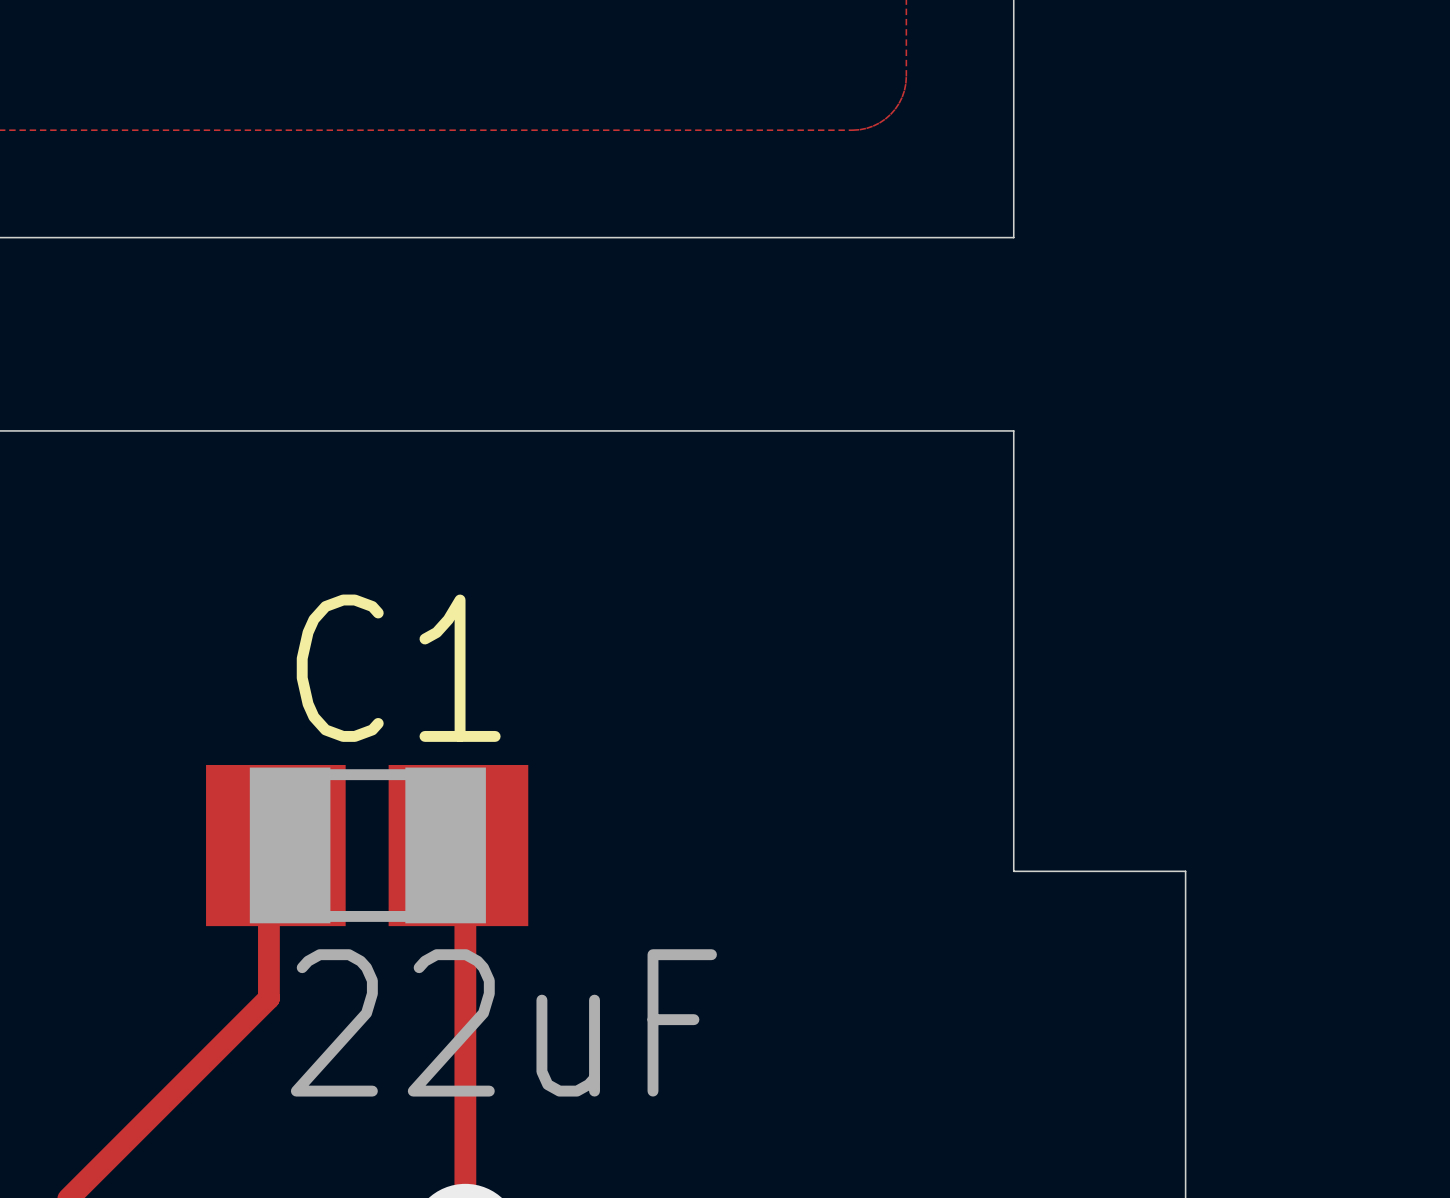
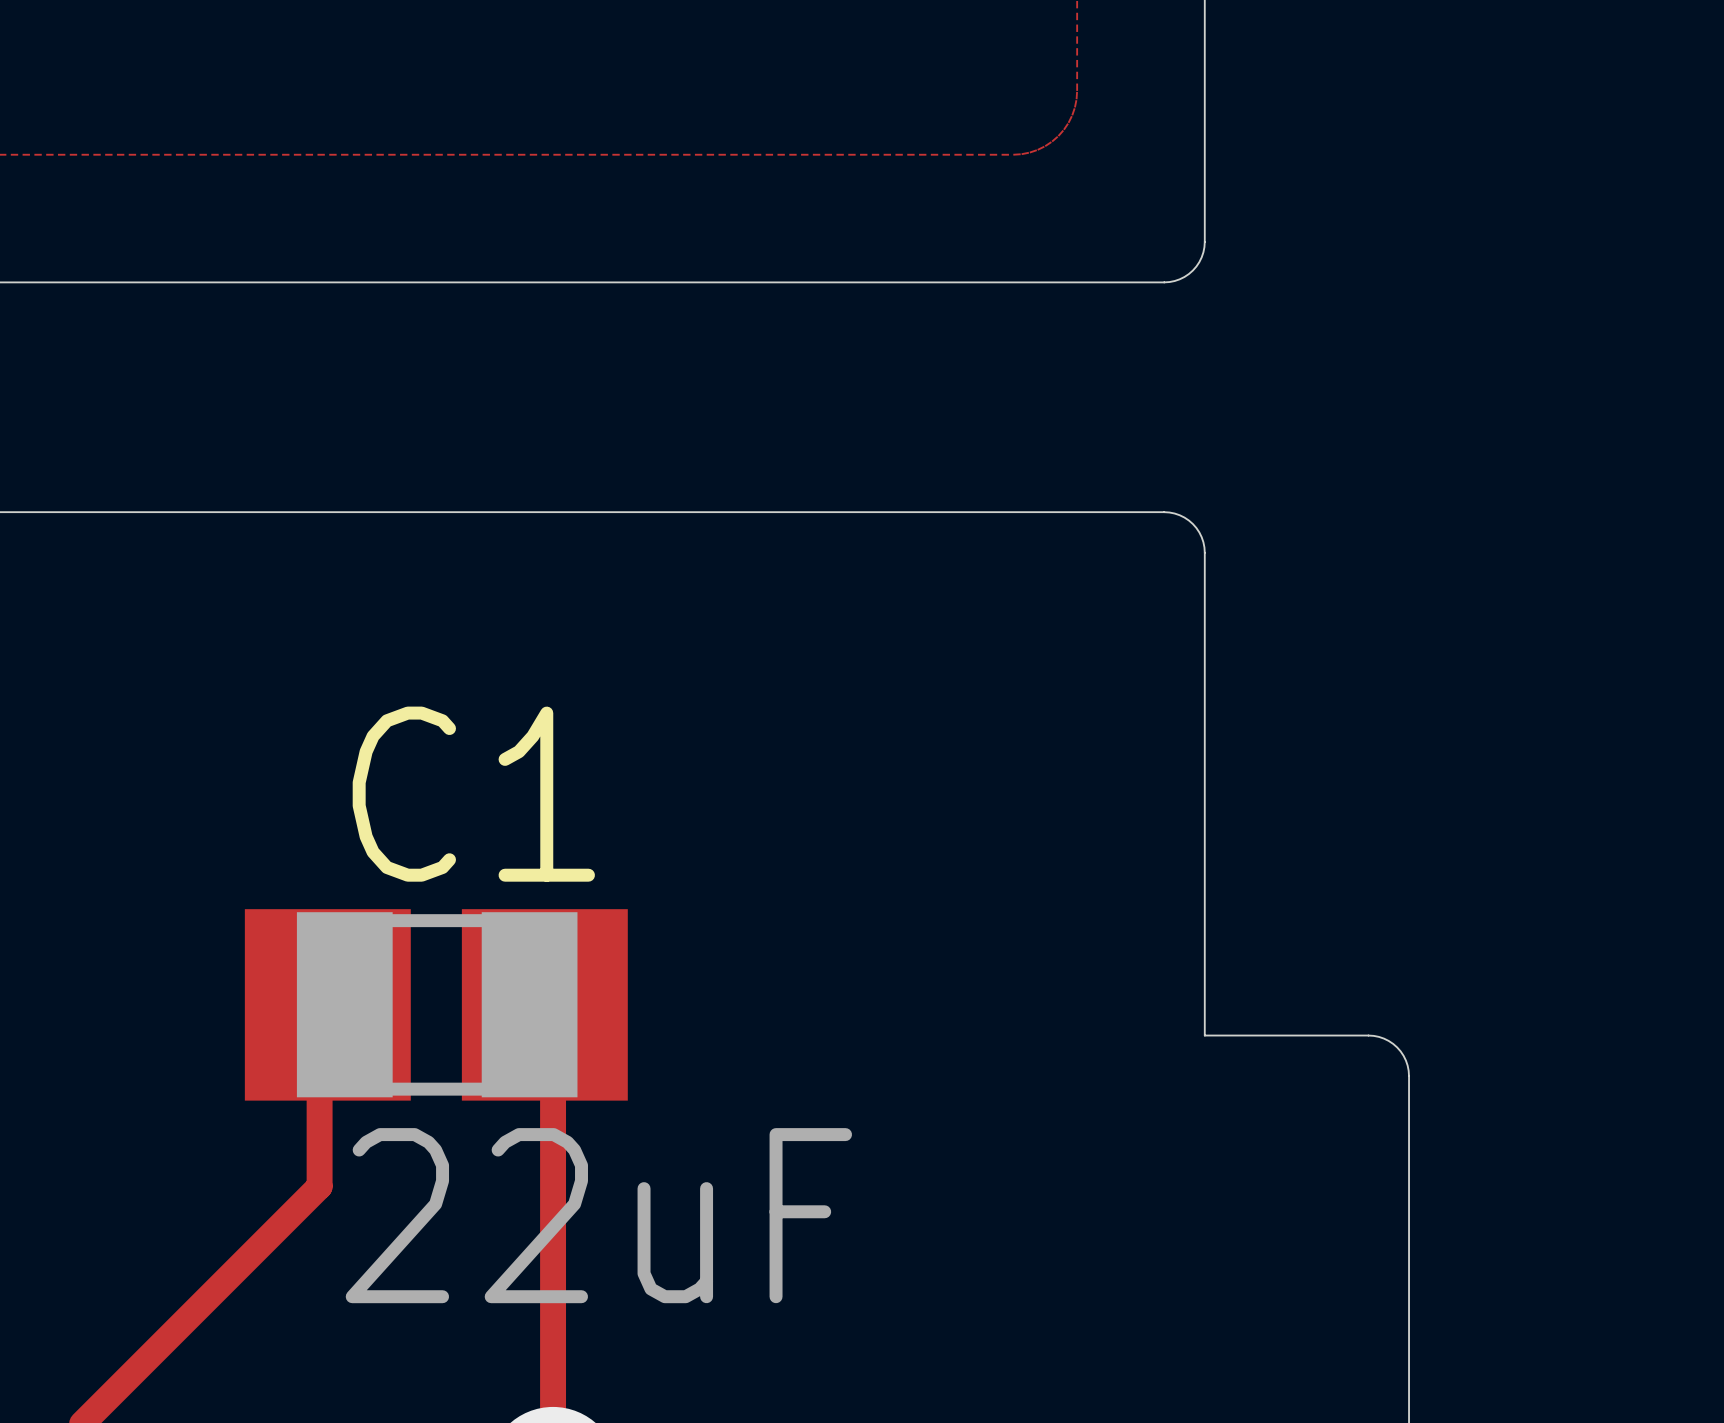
board edge: (1013, 203) (1013, 237) (979, 237) -> (1204, 241) (1201, 257) (1192, 270) (1179, 279) (1164, 282)
board edge: (979, 430) (1013, 430) (1013, 465) -> (1164, 512) (1179, 515) (1192, 524) (1201, 537) (1204, 552)
board edge: (1151, 871) (1185, 871) (1185, 905) -> (1368, 1035) (1384, 1038) (1397, 1047) (1405, 1060) (1409, 1076)

